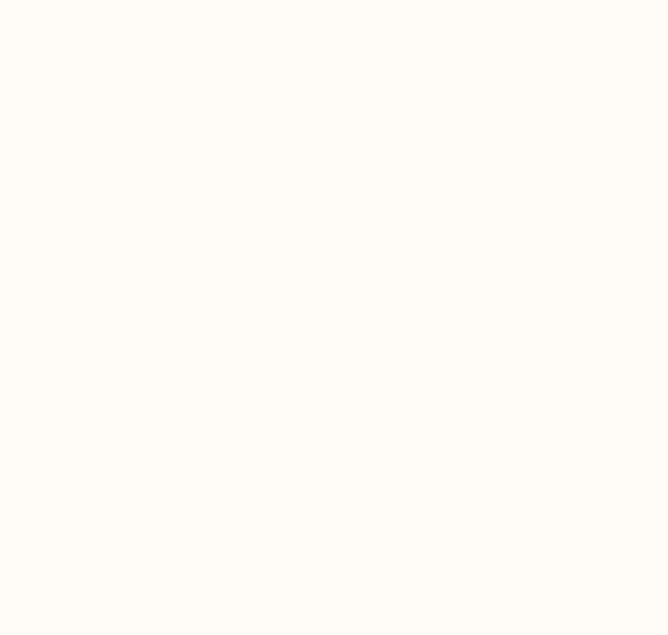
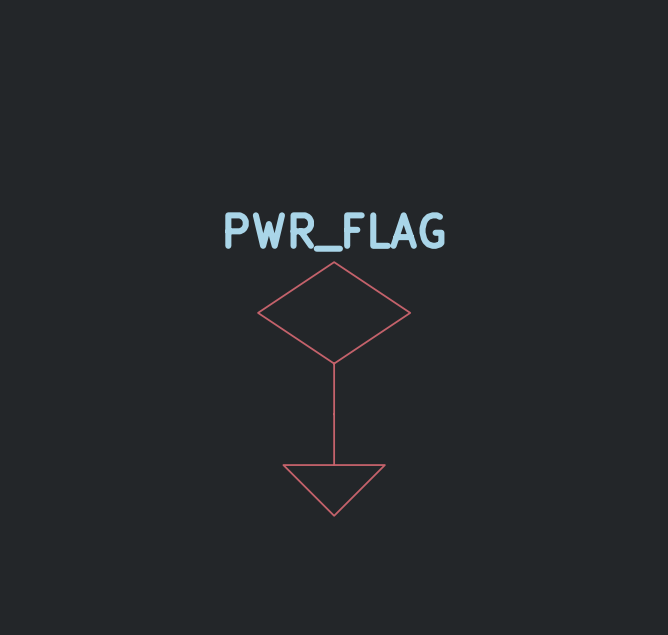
power symbol: none -> PWR_FLAG (334, 338)
power symbol: none -> (334, 465)

